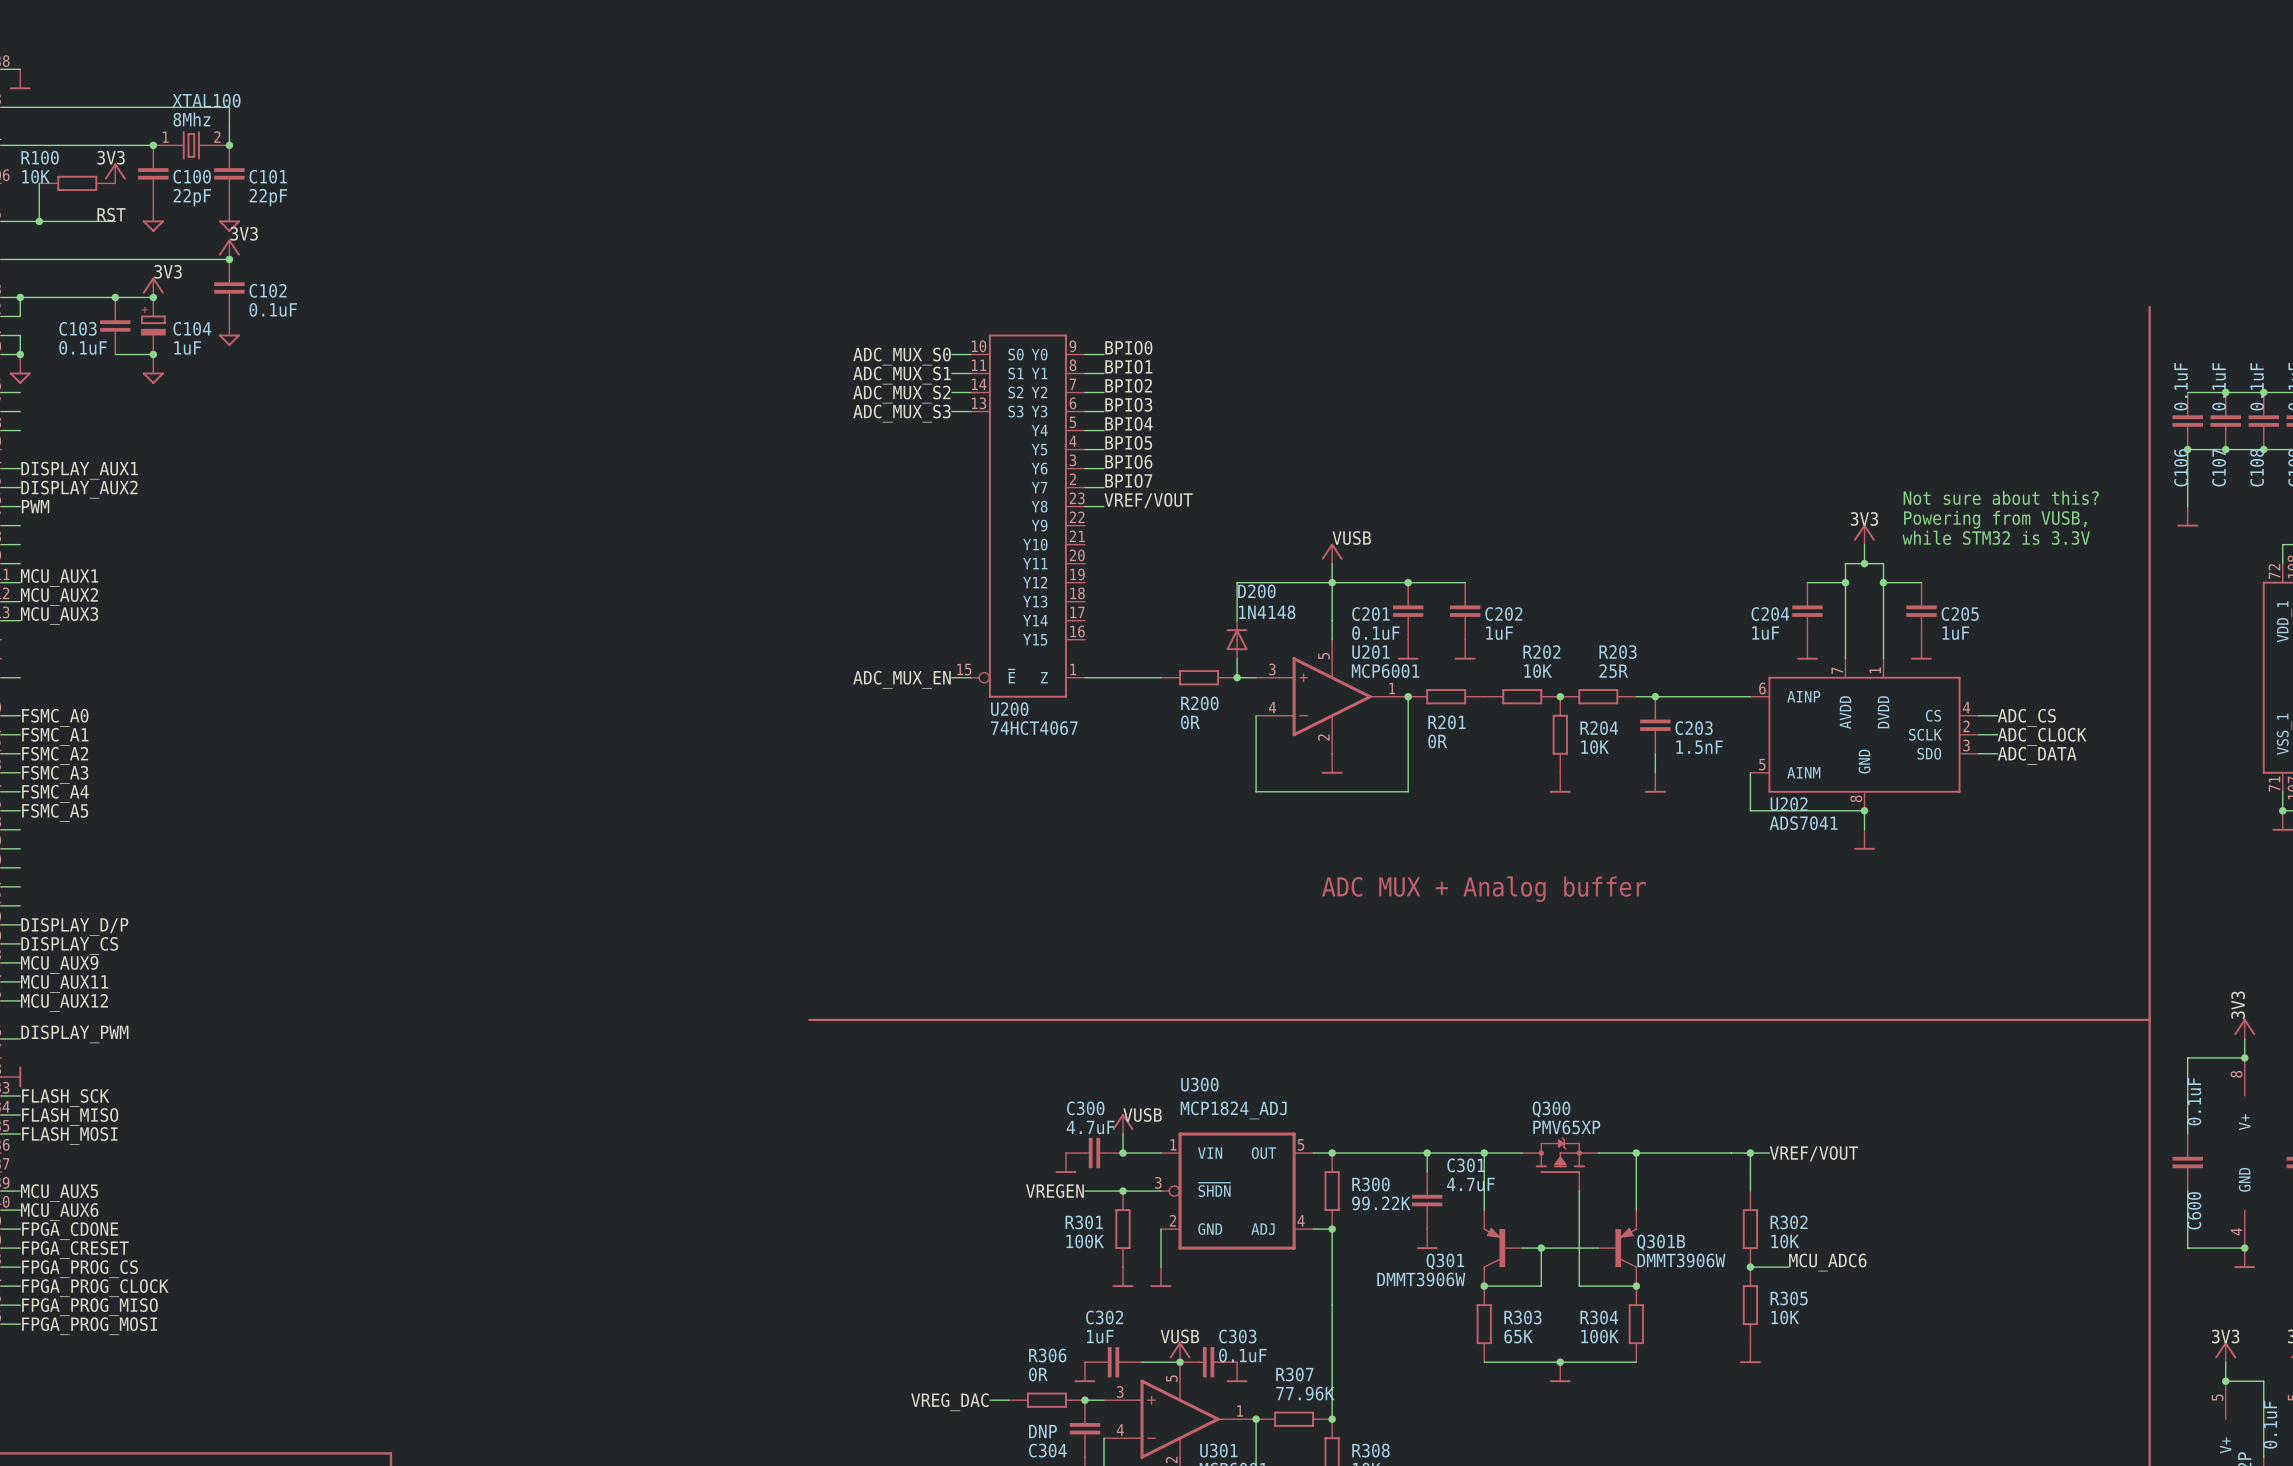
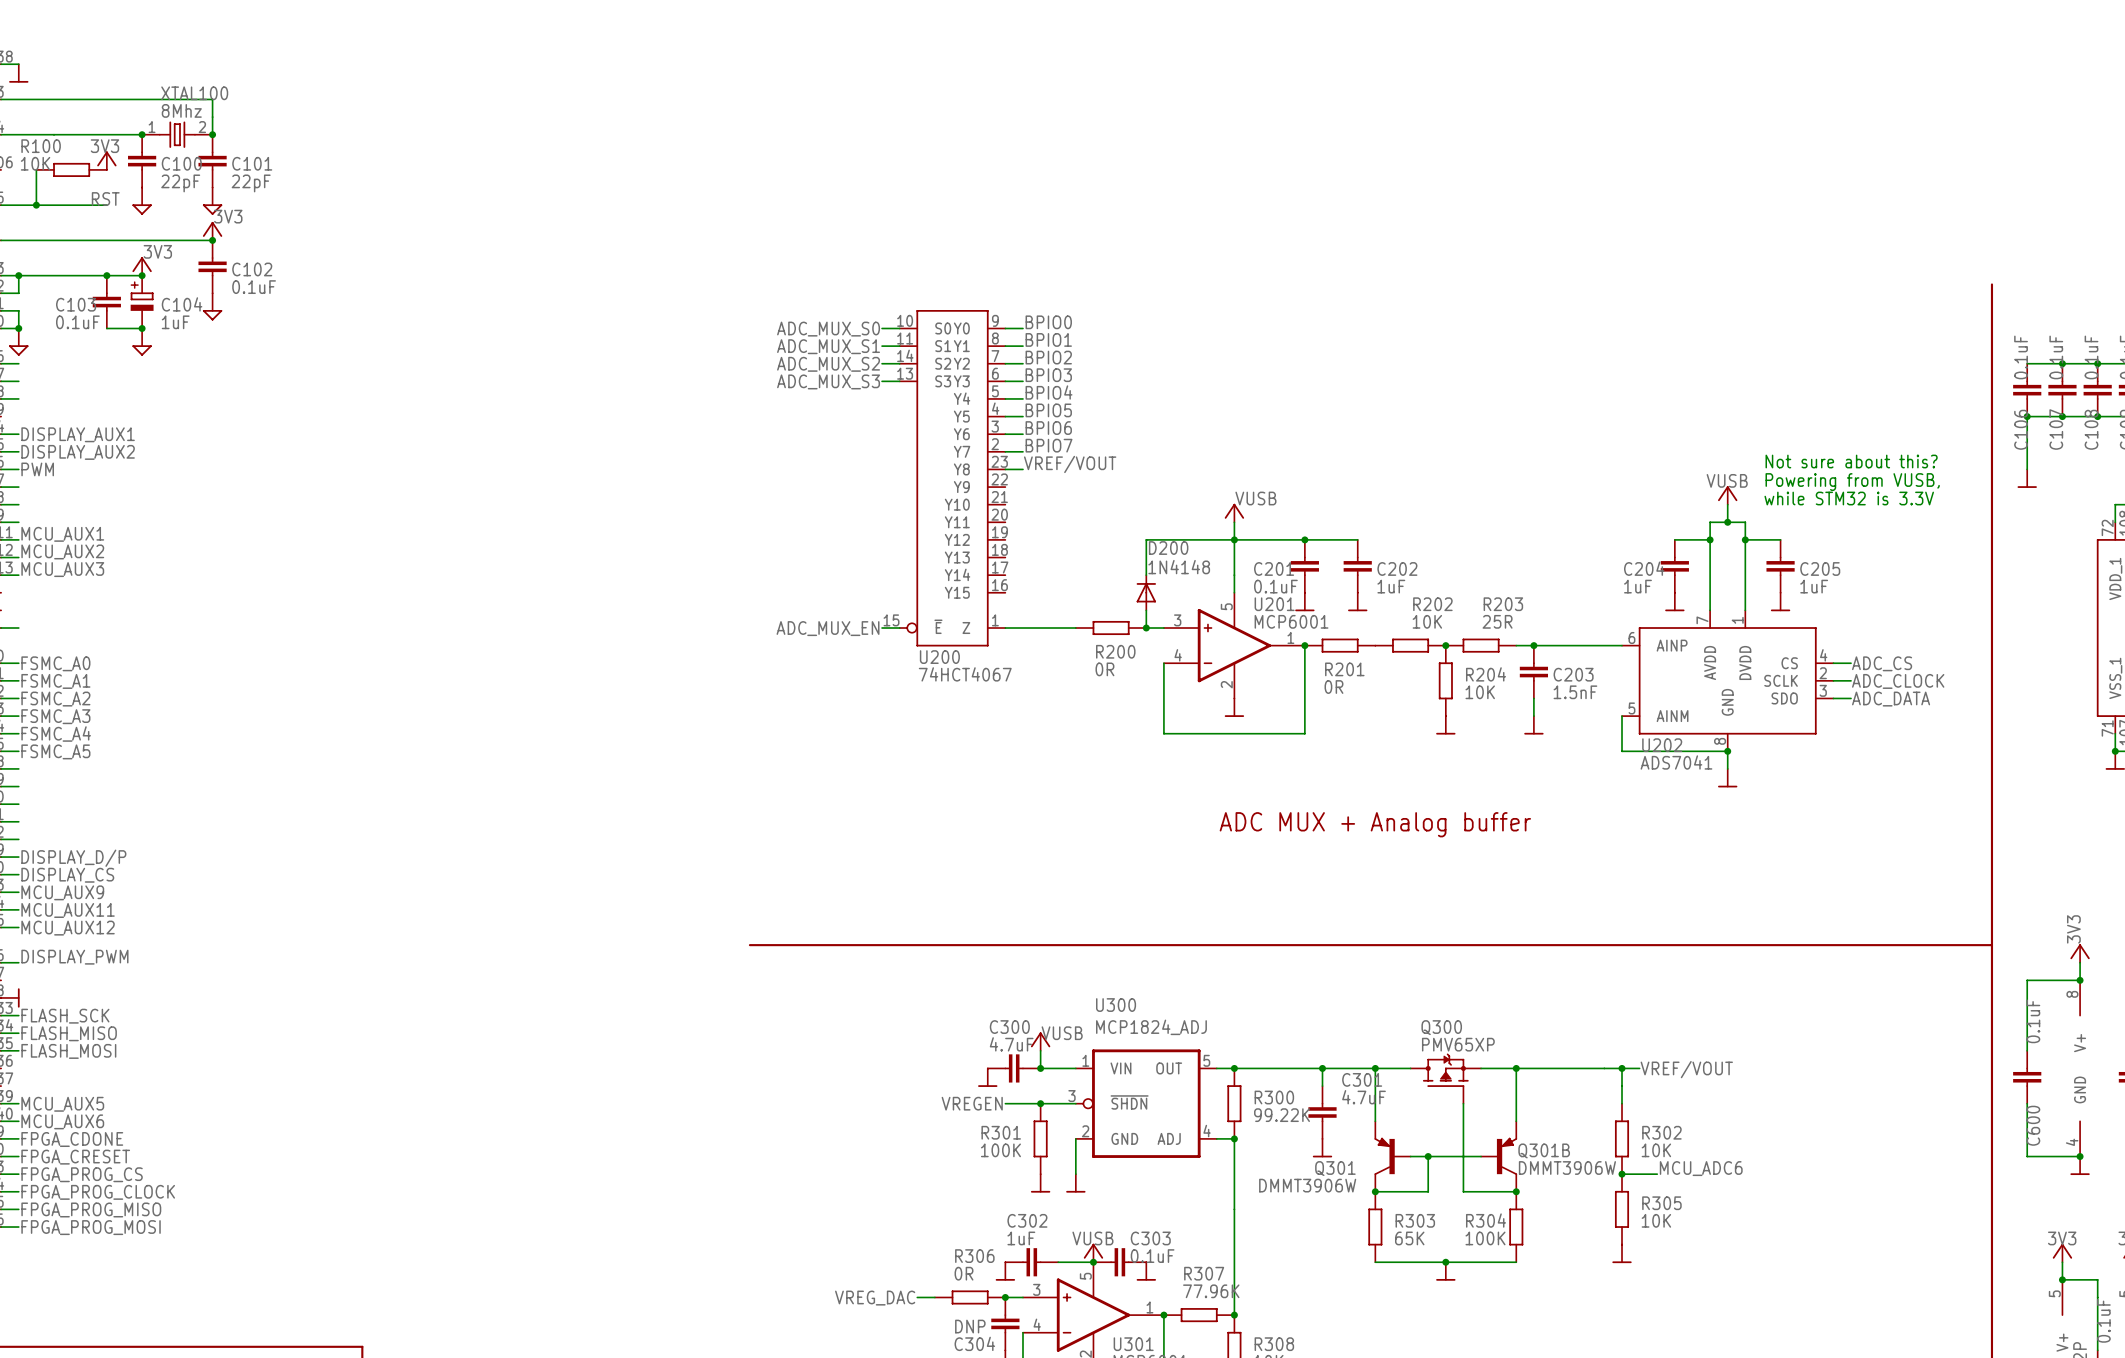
label: 3V3 (1864, 518) -> VUSB (1727, 480)

